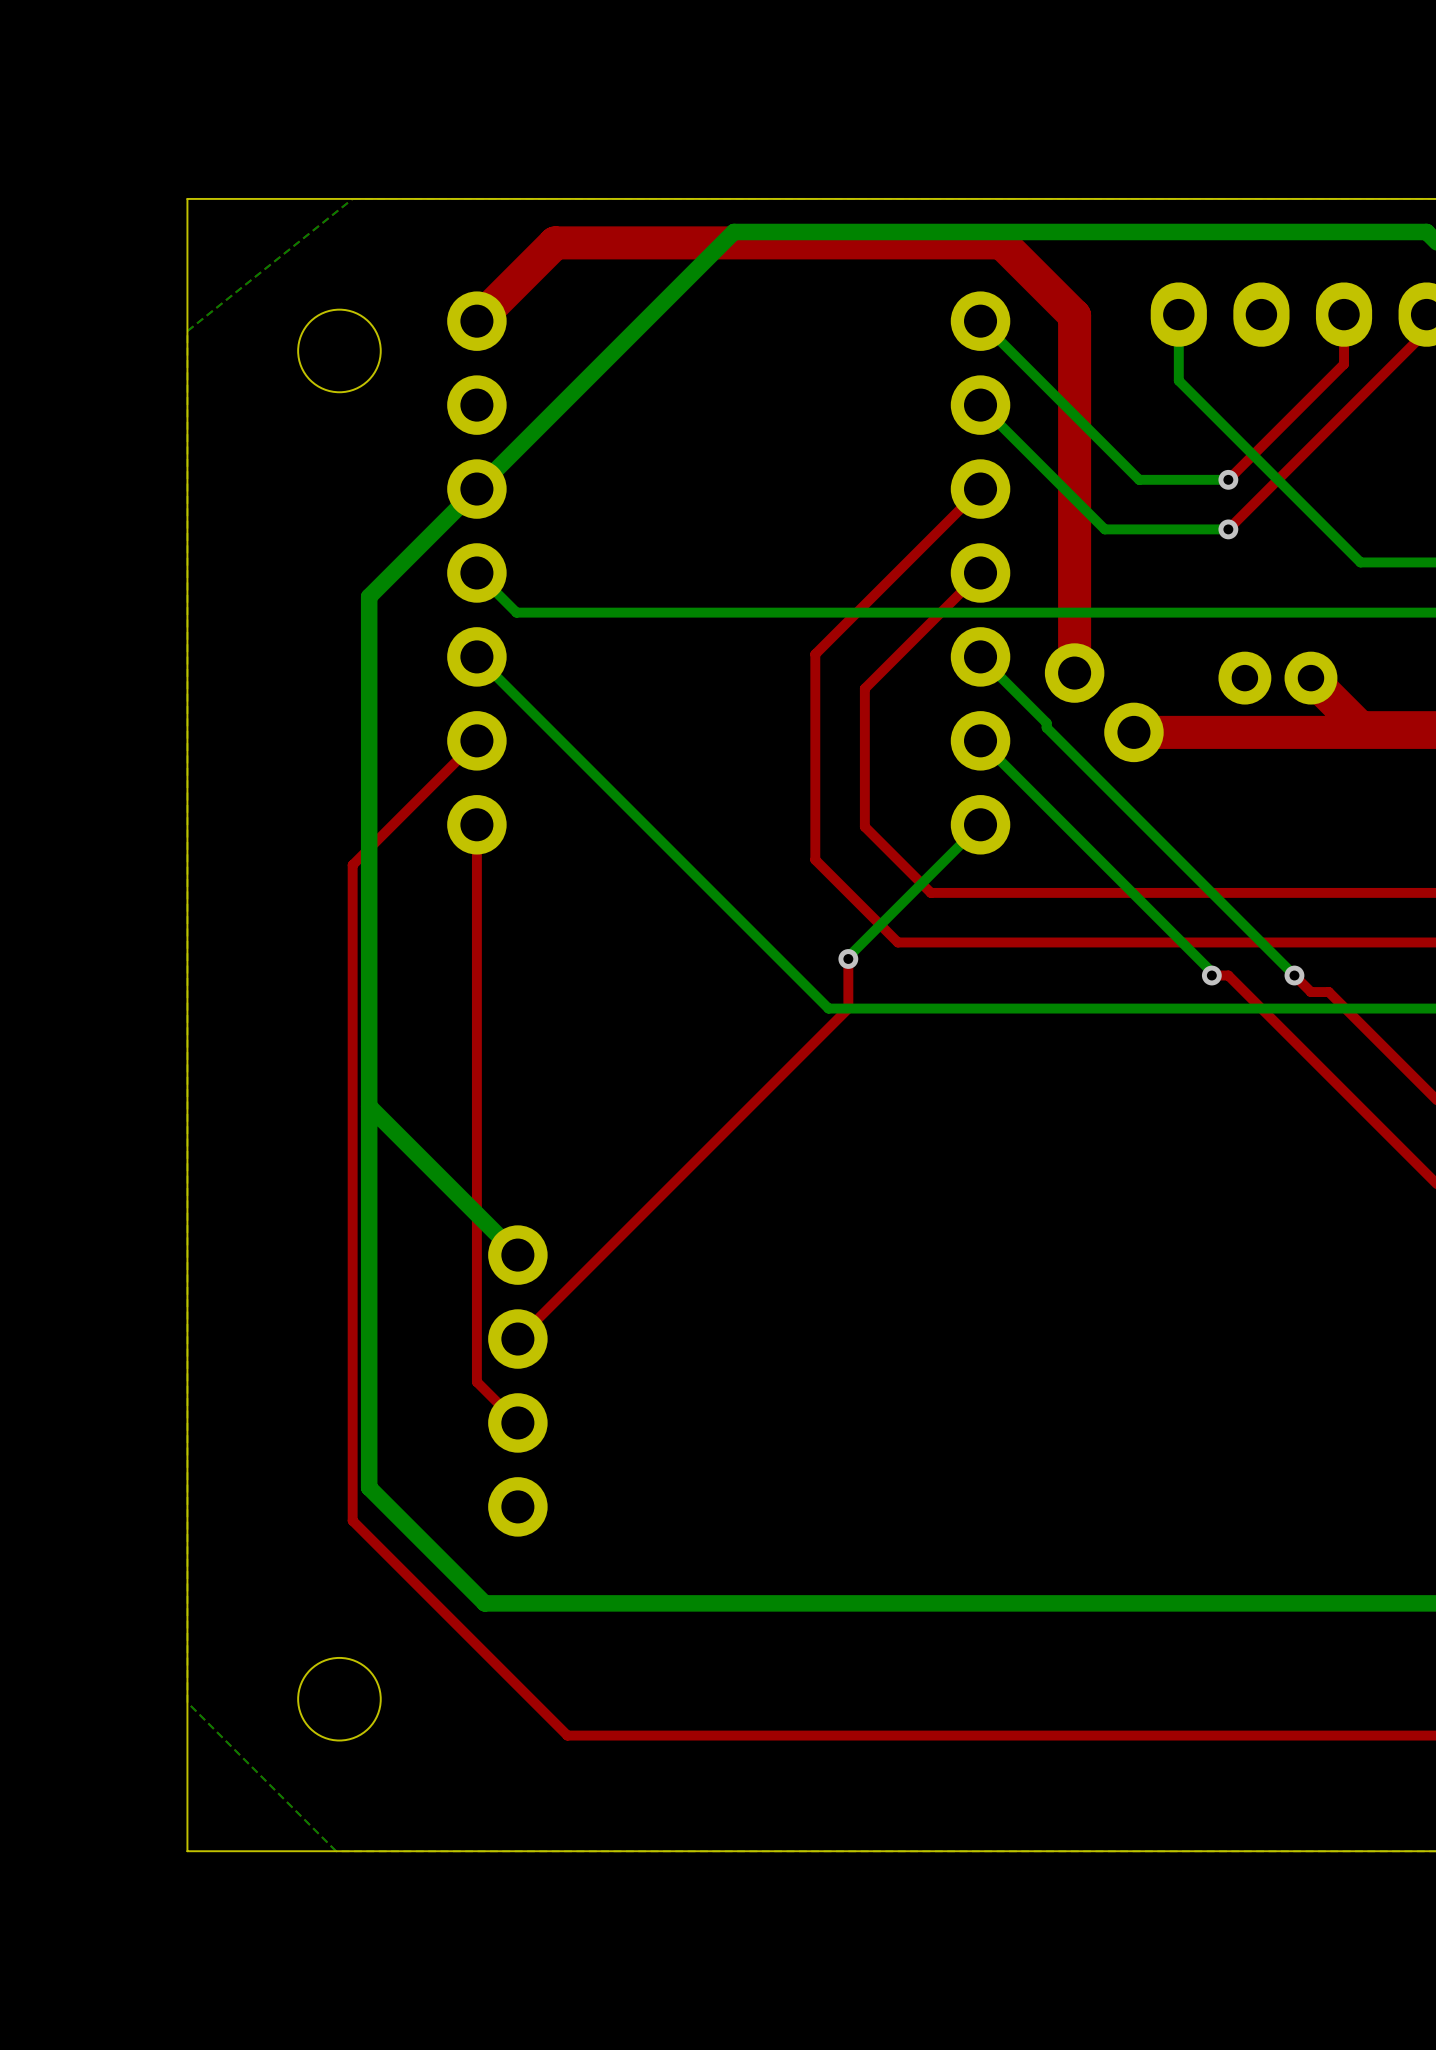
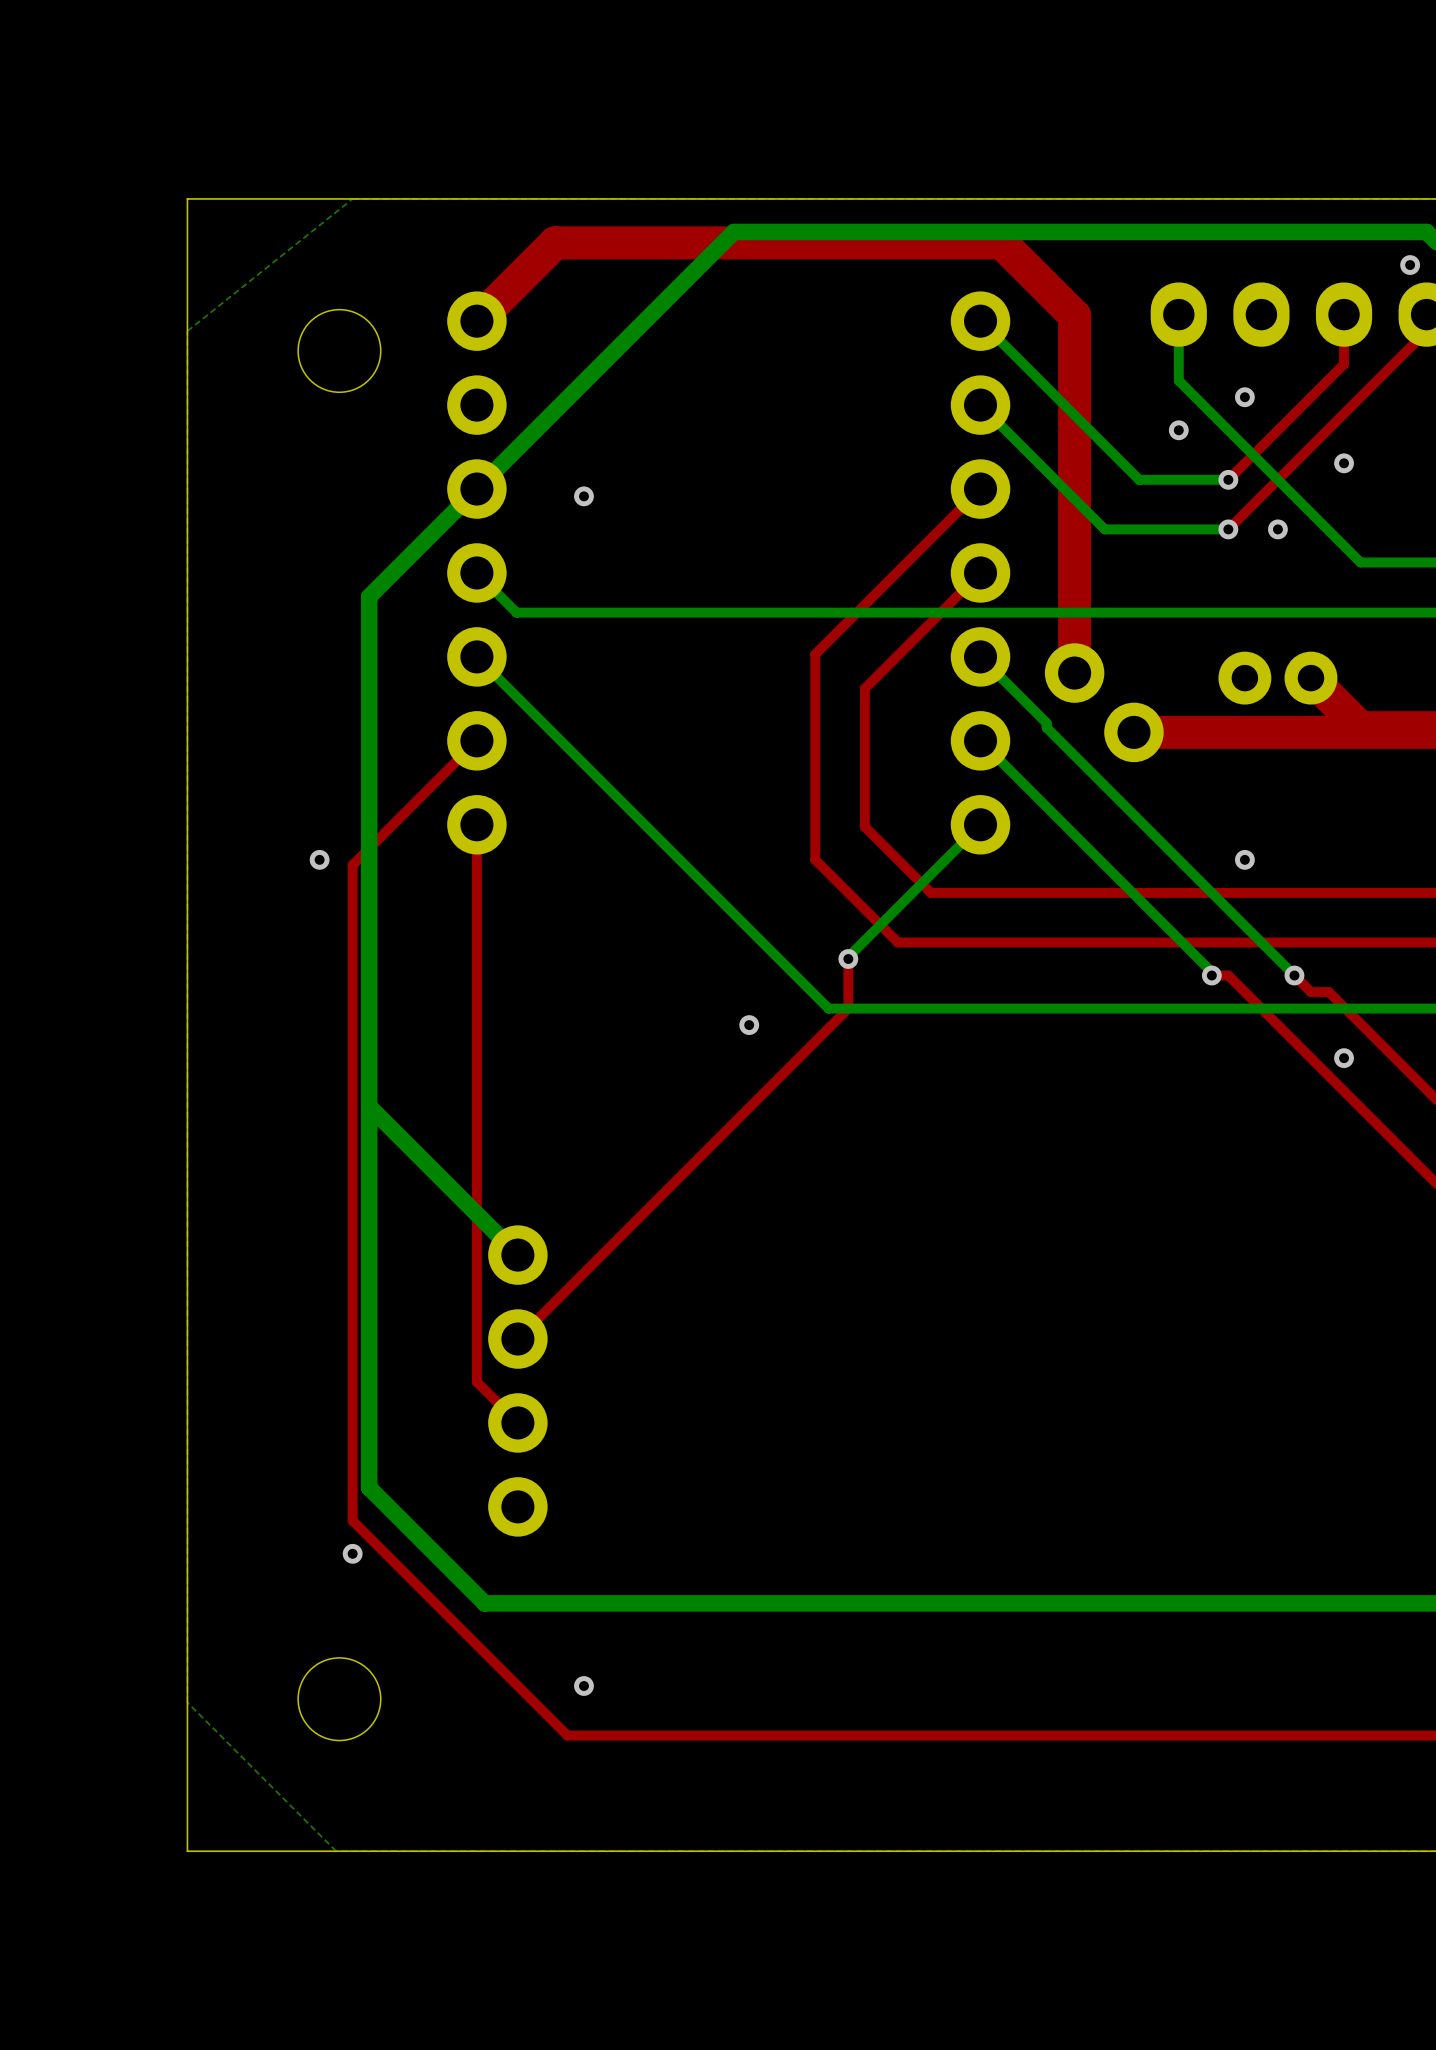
via: none -> (1410, 265)
via: none -> (1244, 397)
via: none -> (1178, 430)
via: none -> (1344, 463)
via: none -> (583, 496)
via: none -> (1277, 529)
via: none -> (319, 859)
via: none -> (1244, 859)
via: none -> (749, 1025)
via: none -> (1344, 1058)
via: none -> (352, 1553)
via: none -> (583, 1686)

